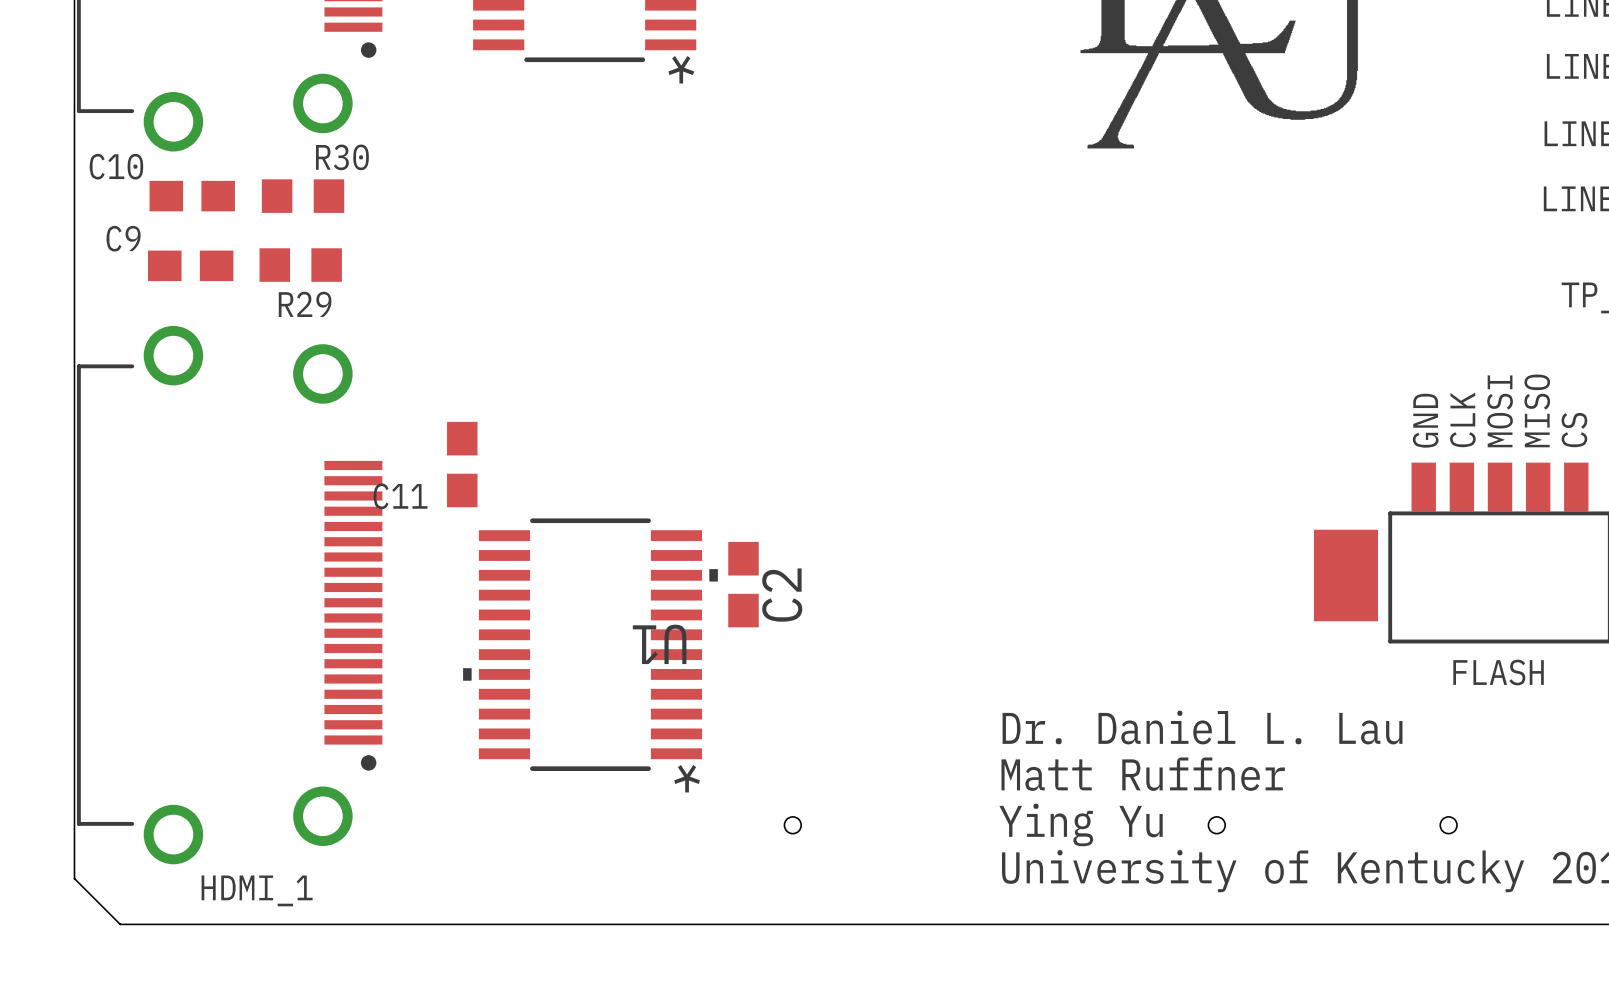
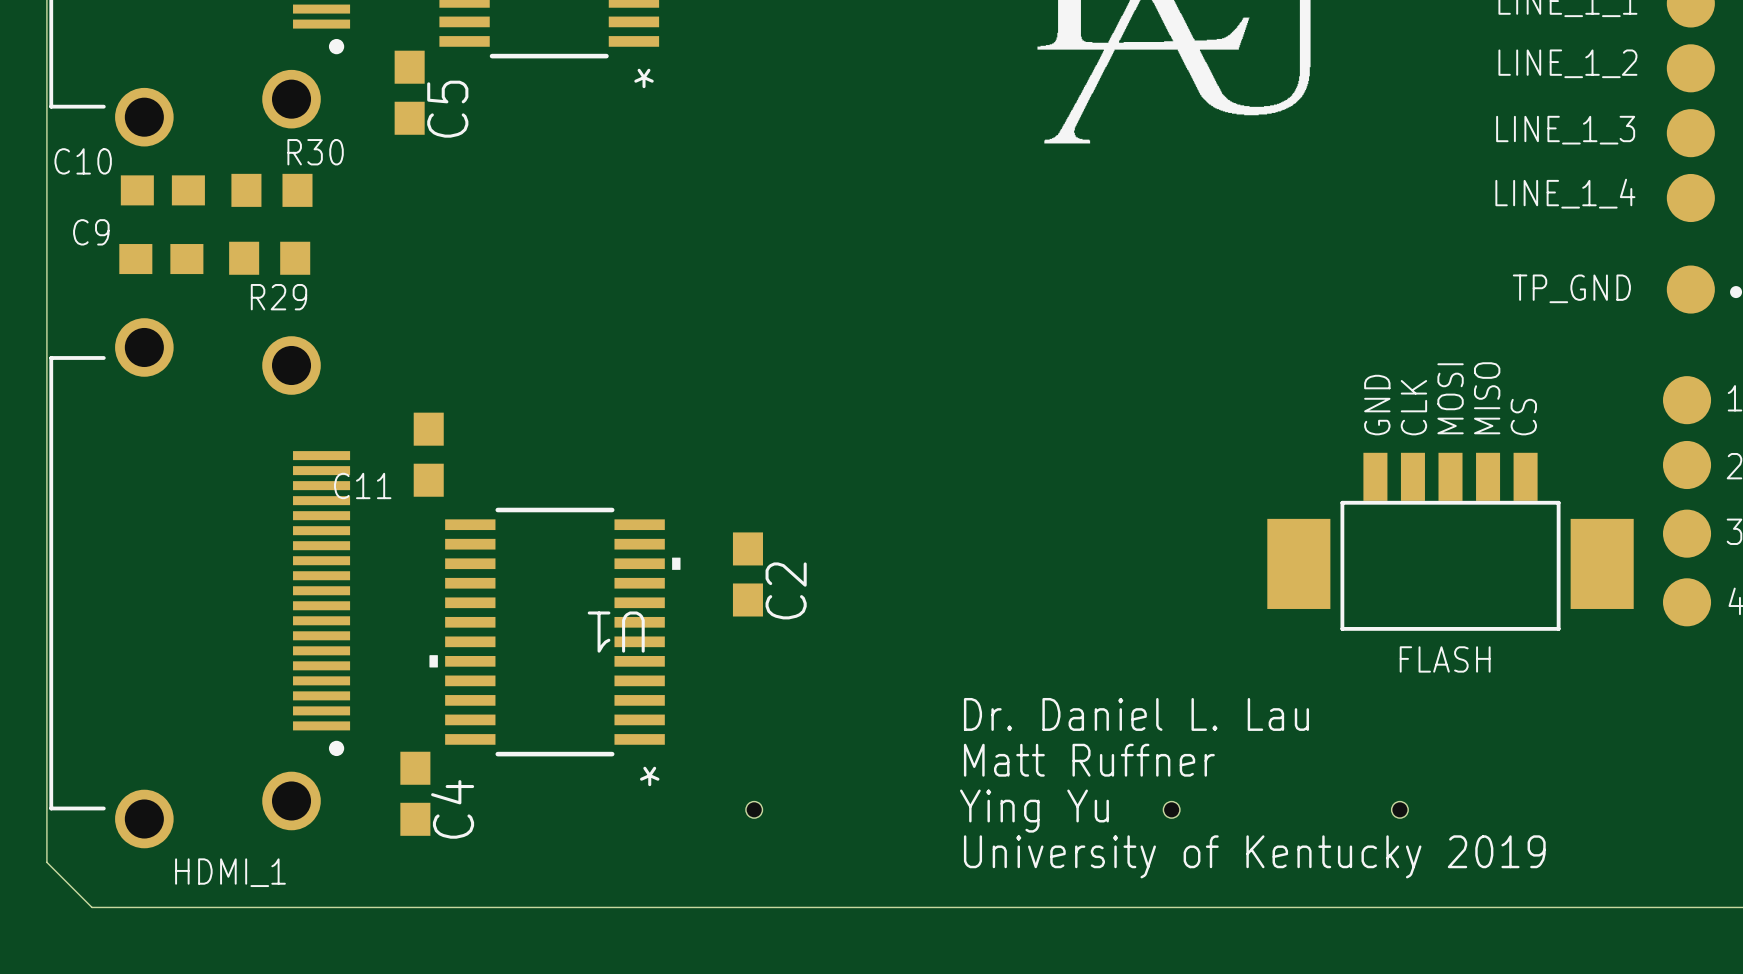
C5: none -> (409, 92)
C2 position: (743, 584) -> (747, 574)
C4: none -> (415, 793)

